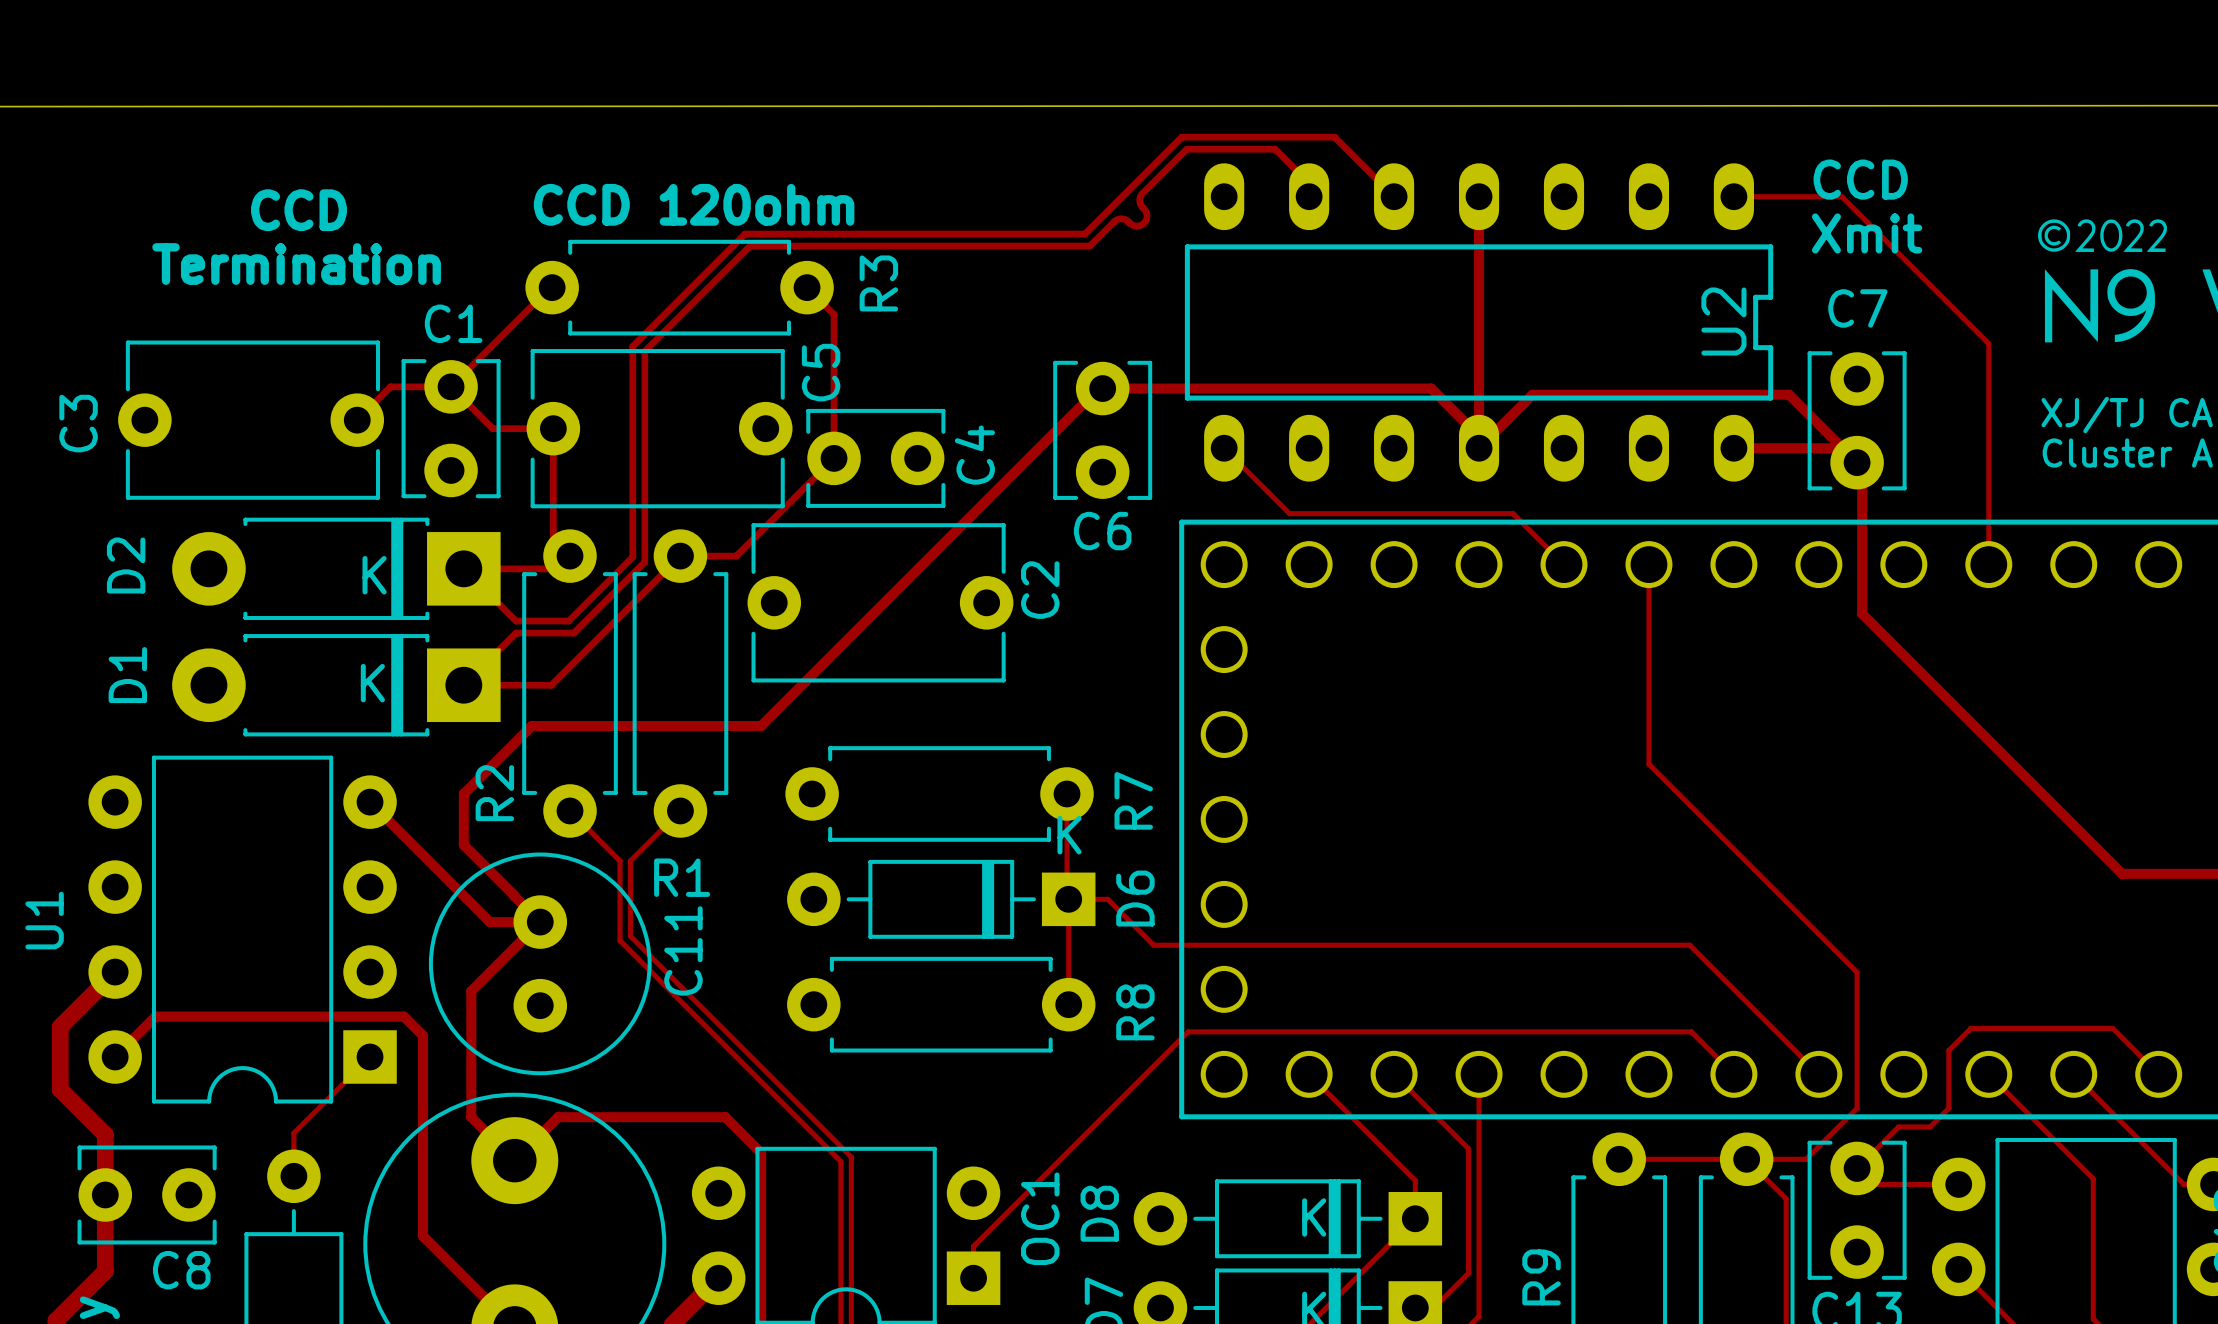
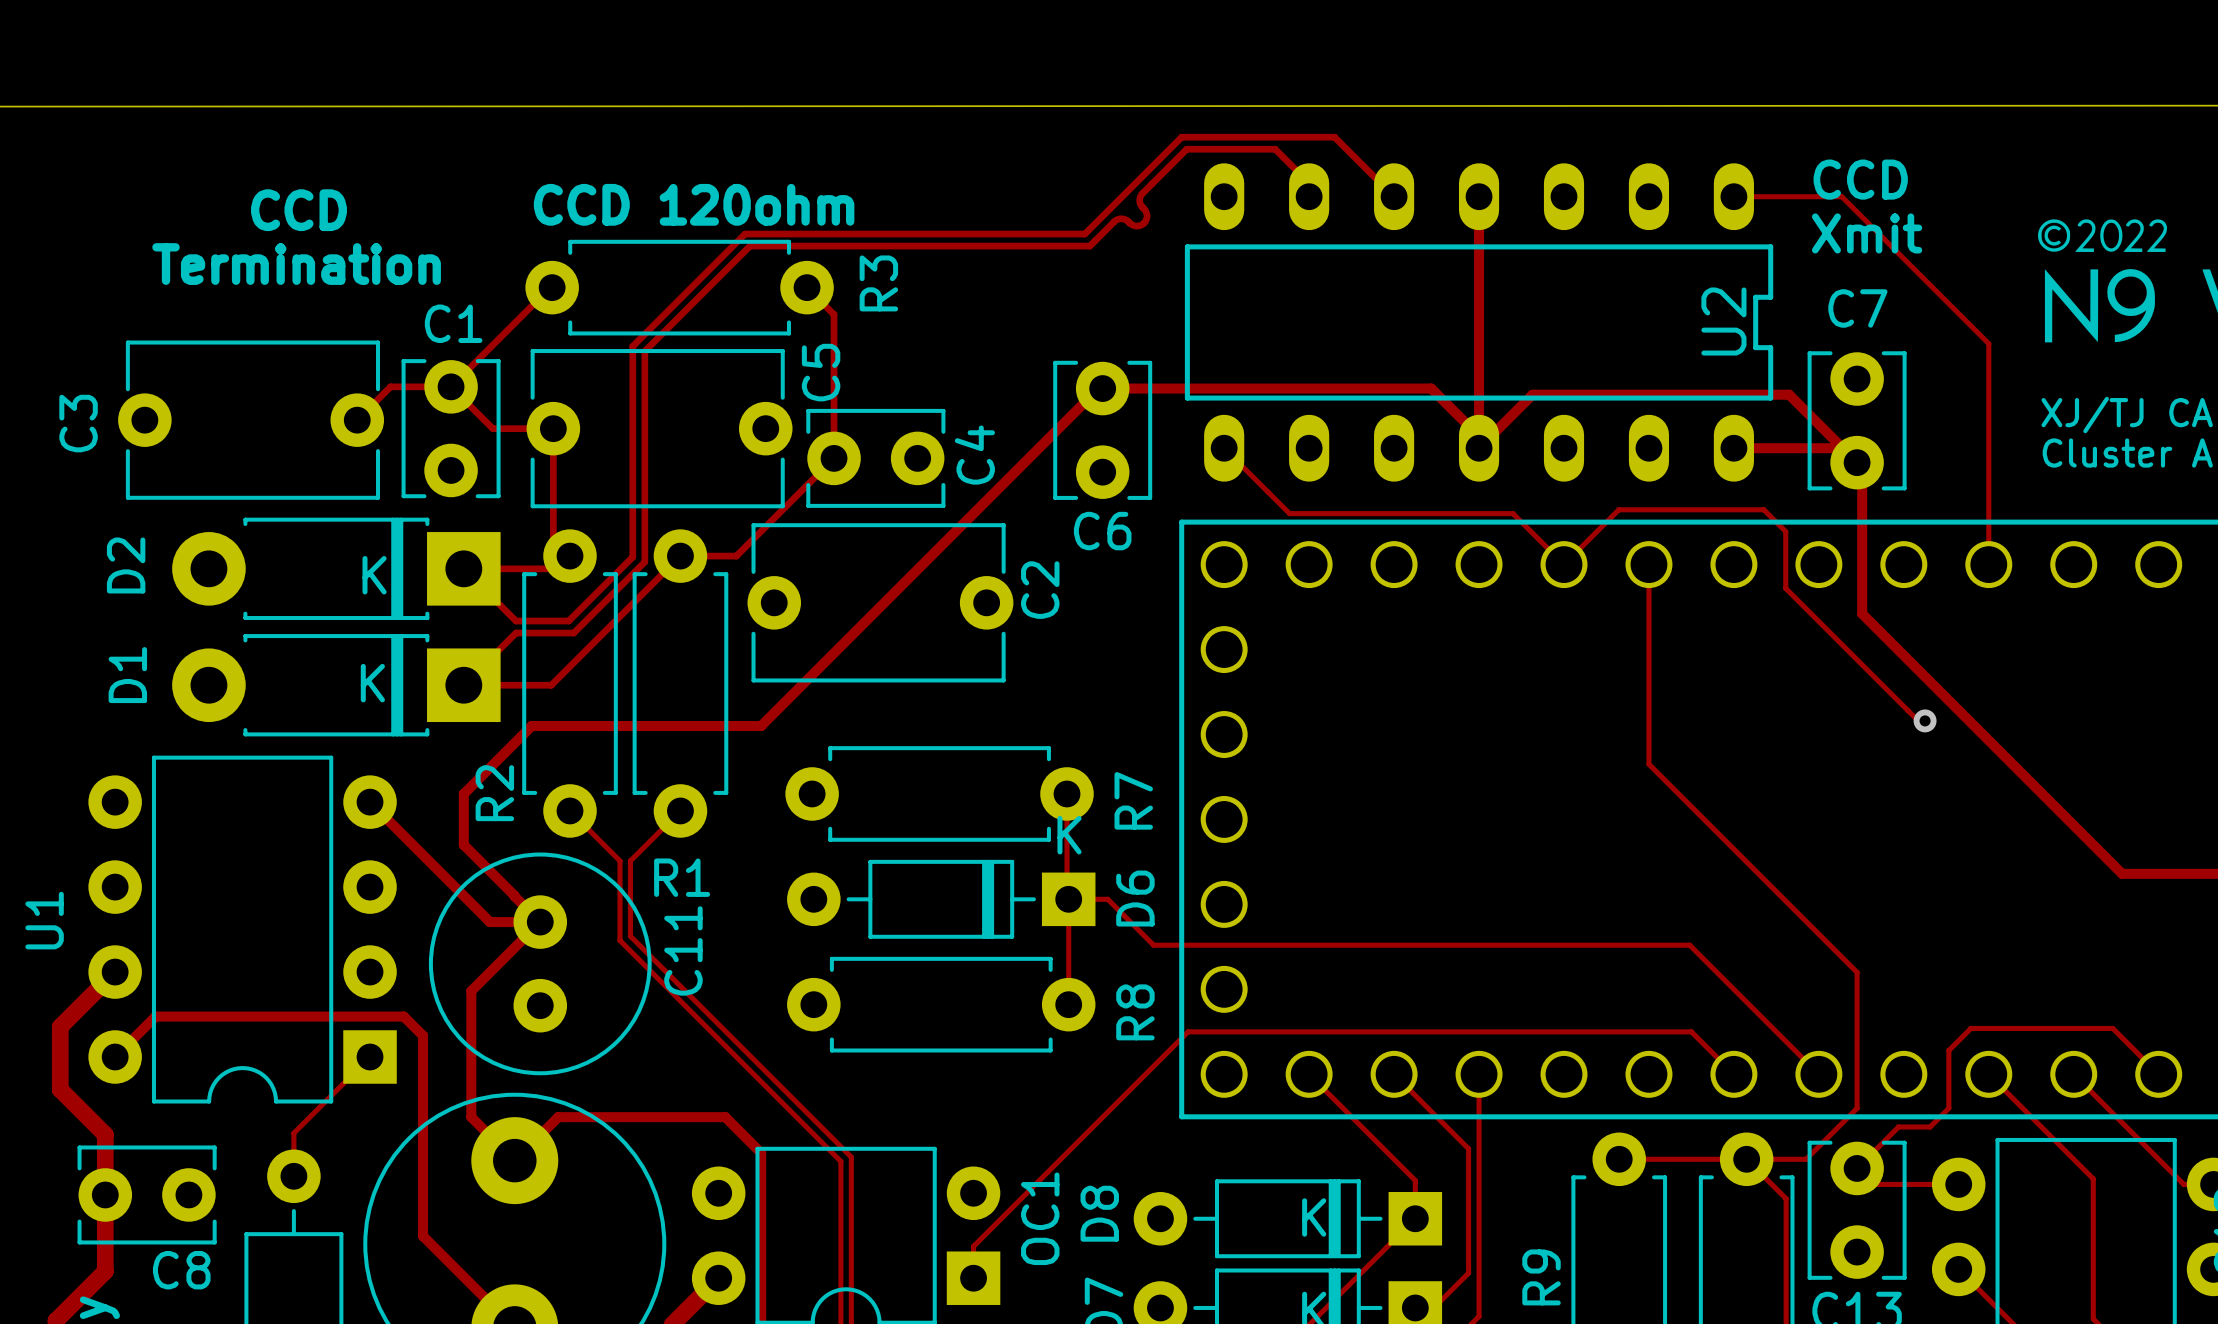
track: none -> (1564, 564) (1618, 509) (1763, 509) (1785, 531) (1785, 588) (1918, 720) (1925, 720)
via: none -> (1925, 720)

